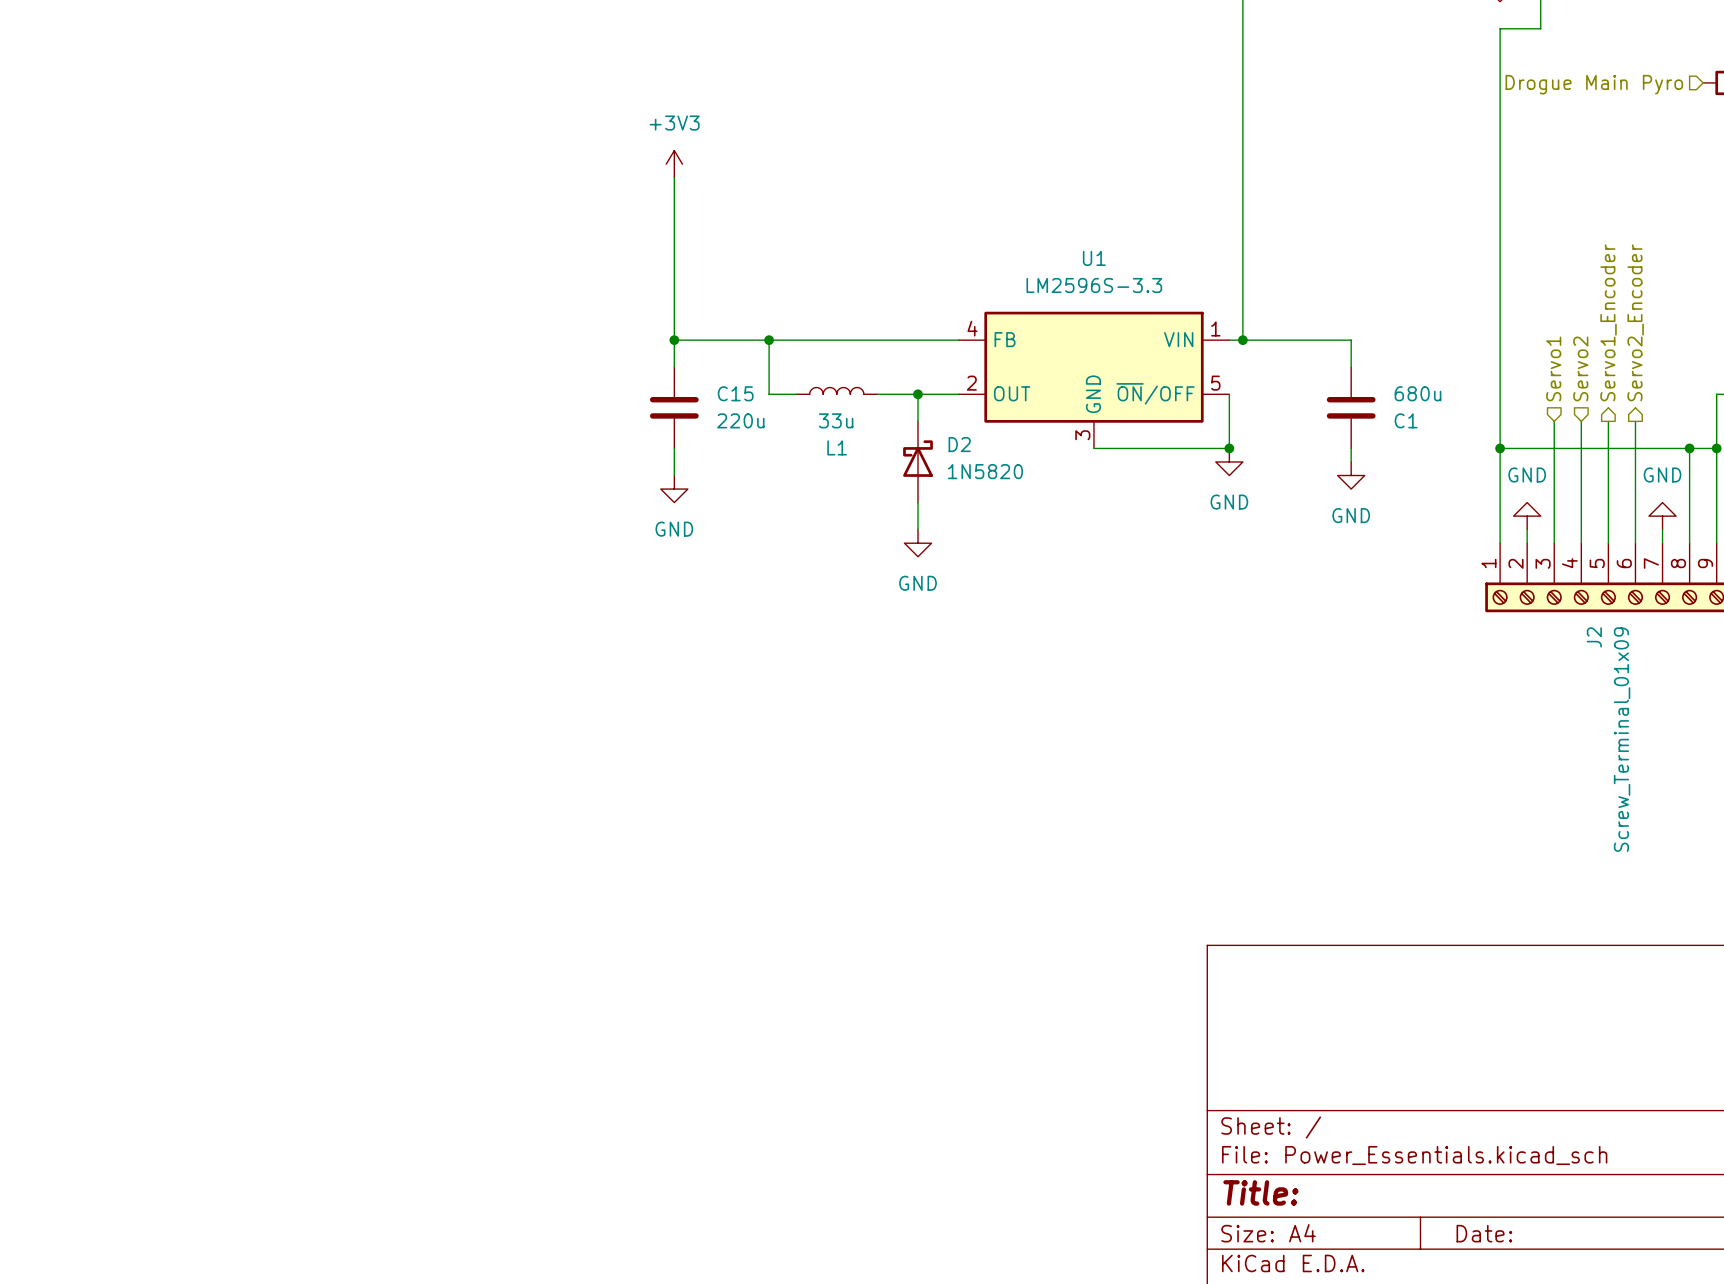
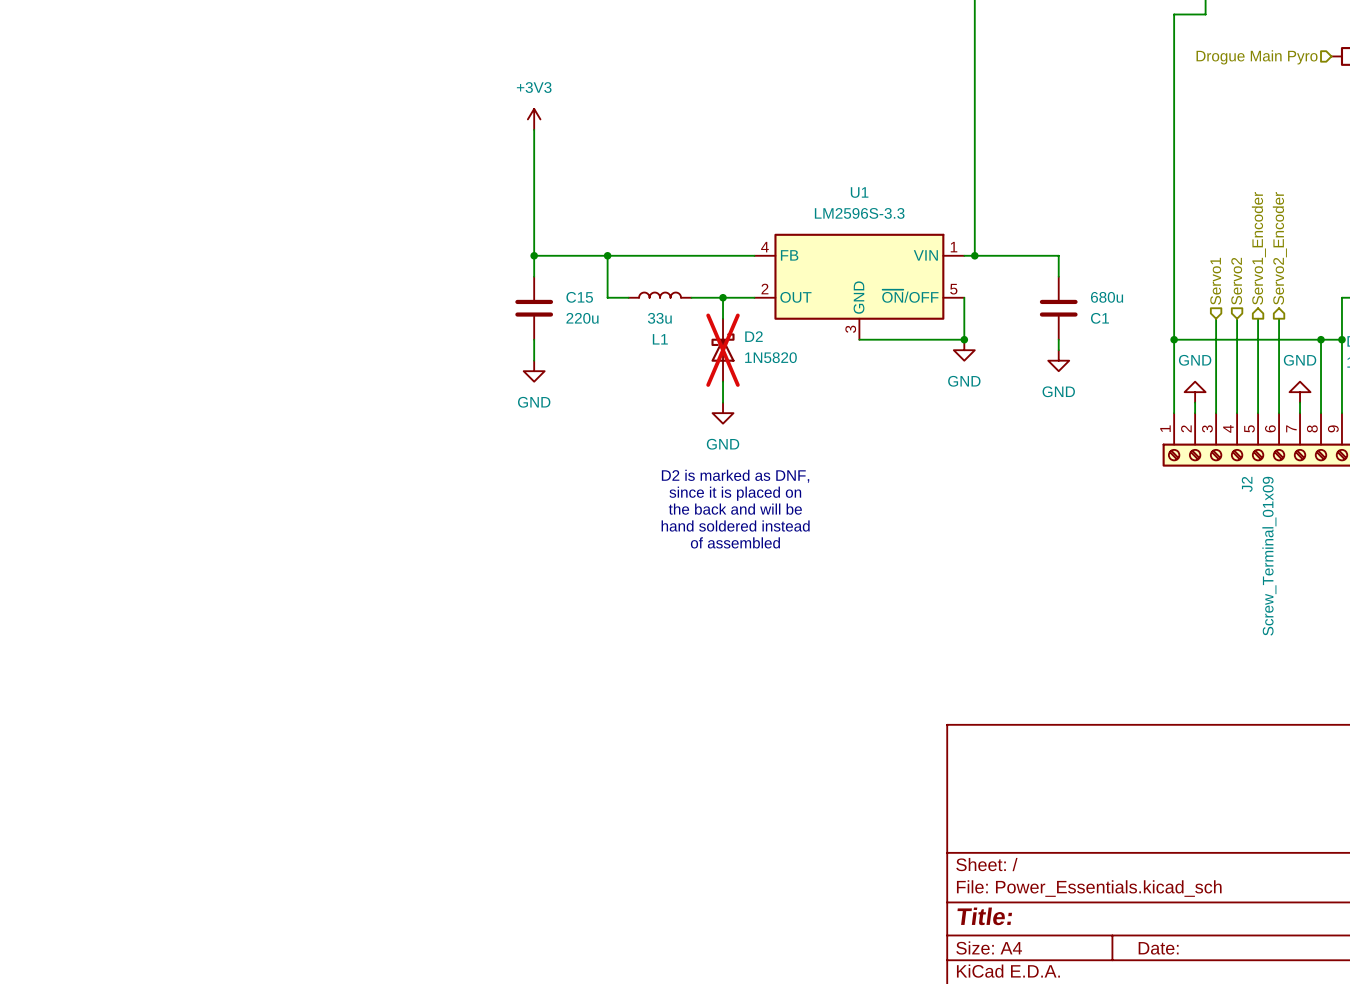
D2 do-not-place cross: none -> (723, 350)
text: none -> D2 is marked as DNF, (735, 476)
text: none -> since it is placed on (735, 493)
text: none -> the back and will be (735, 509)
text: none -> hand soldered instead (735, 525)
text: none -> of assembled (735, 542)

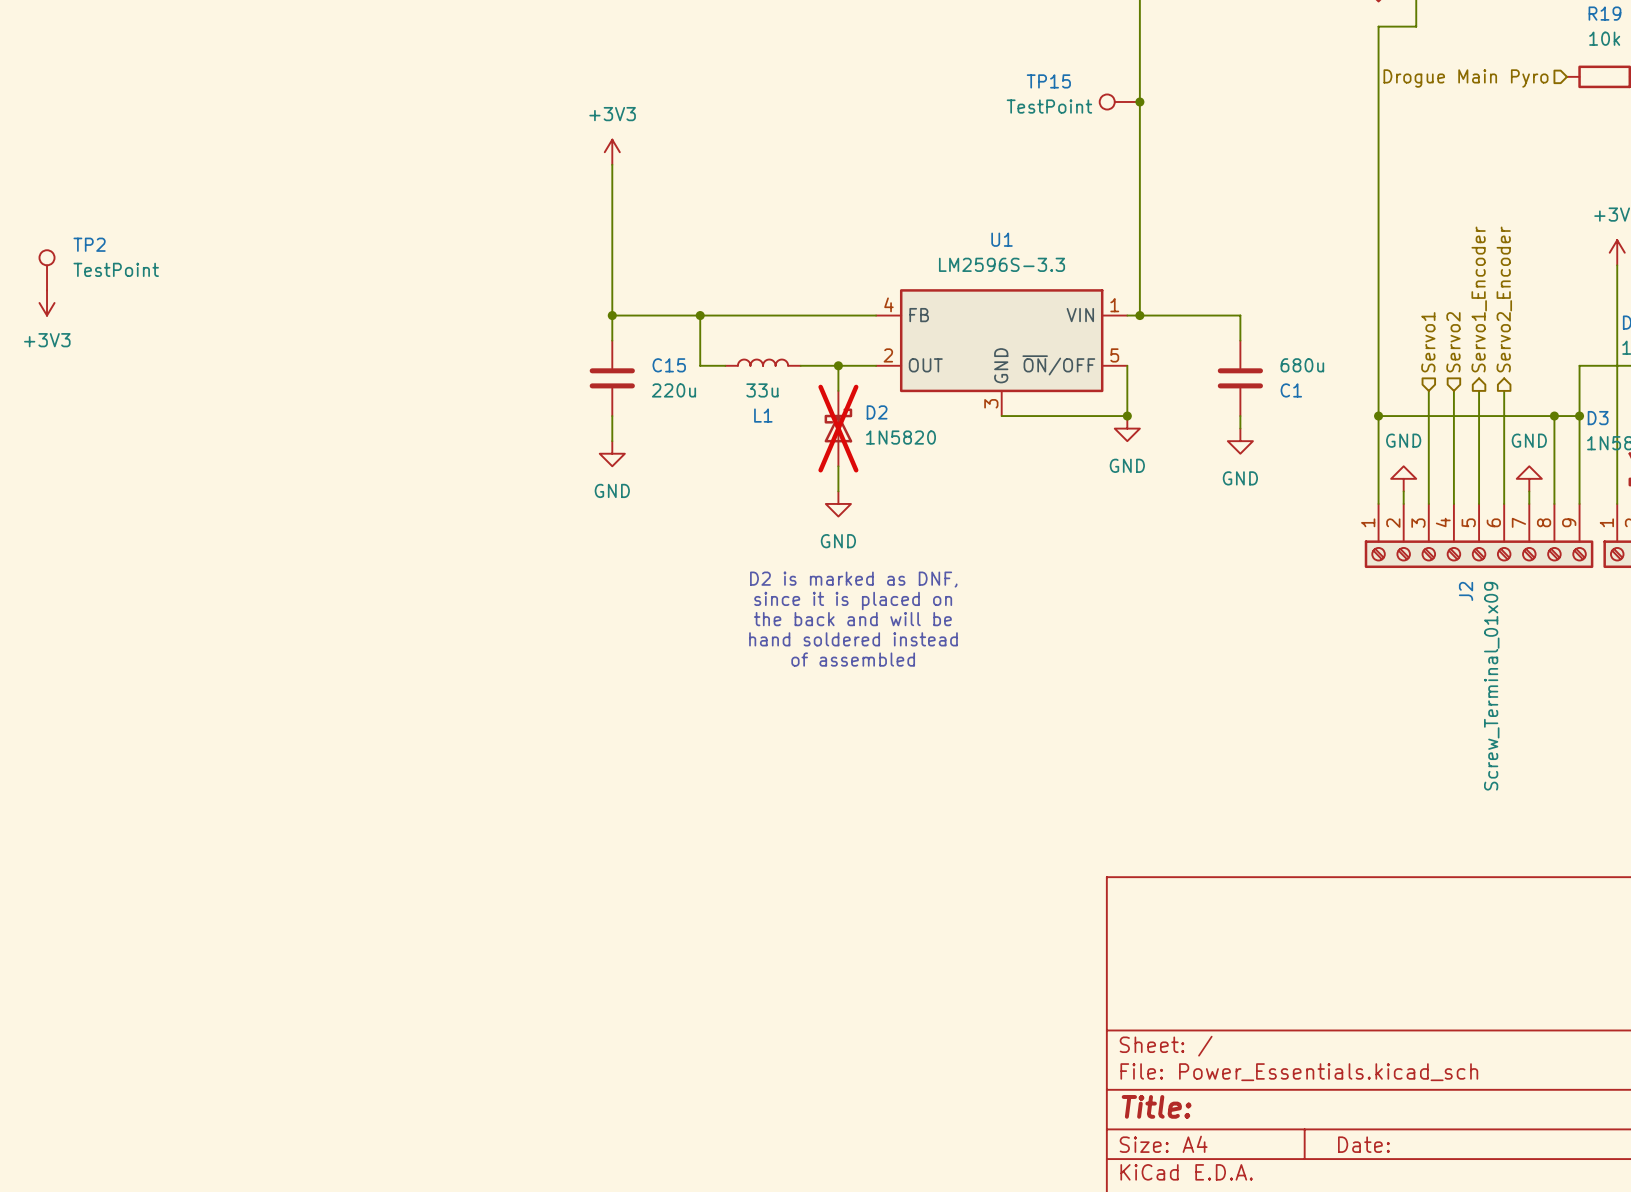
TP15: none -> TestPoint (1119, 101)
junction: none -> (1139, 101)
TP2: none -> TestPoint (47, 270)
power symbol: none -> +3V3 (47, 302)

